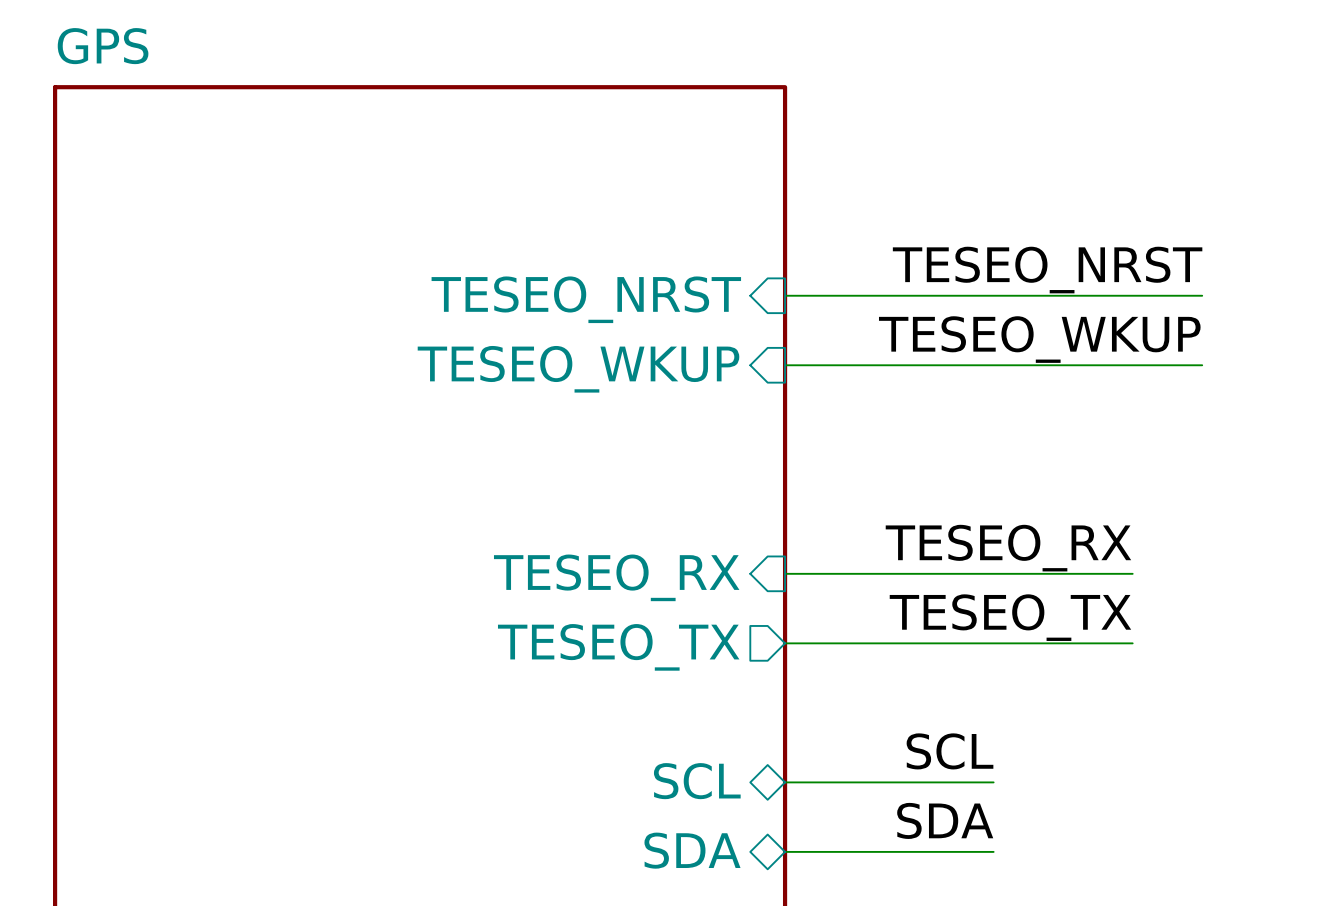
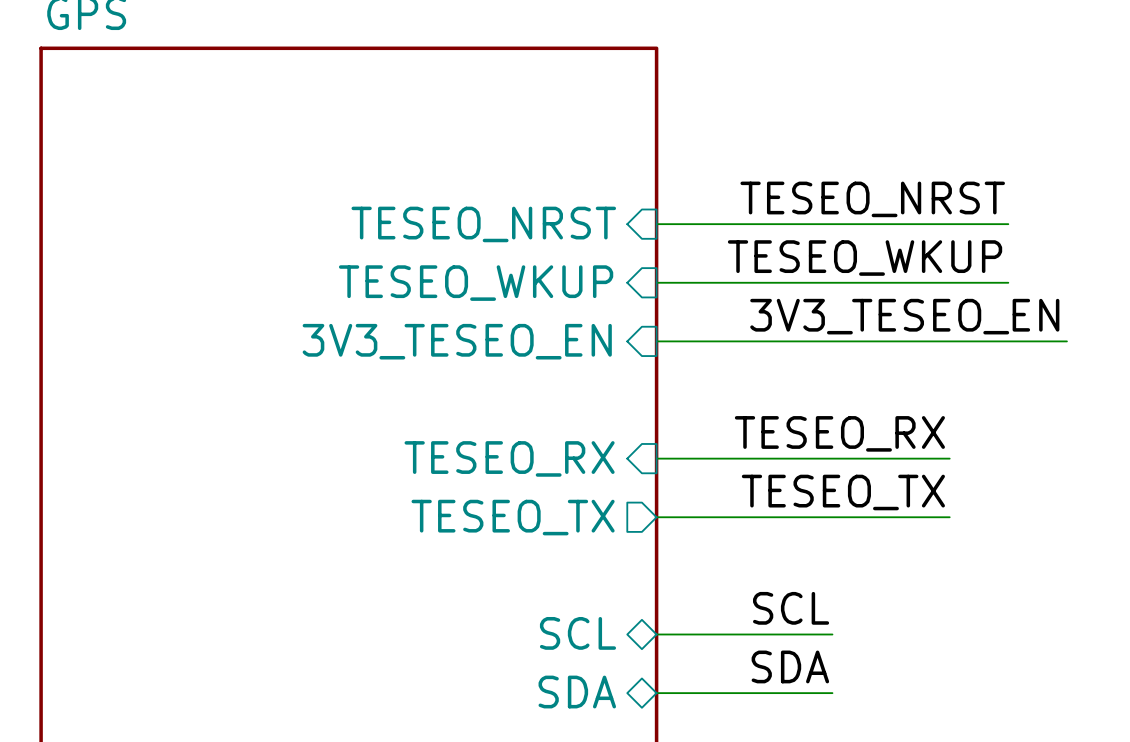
label: none -> 3V3_TESEO_EN (904, 316)
wire: none -> (656, 341) (1066, 341)
sheet pin: none -> 3V3_TESEO_EN (457, 341)

